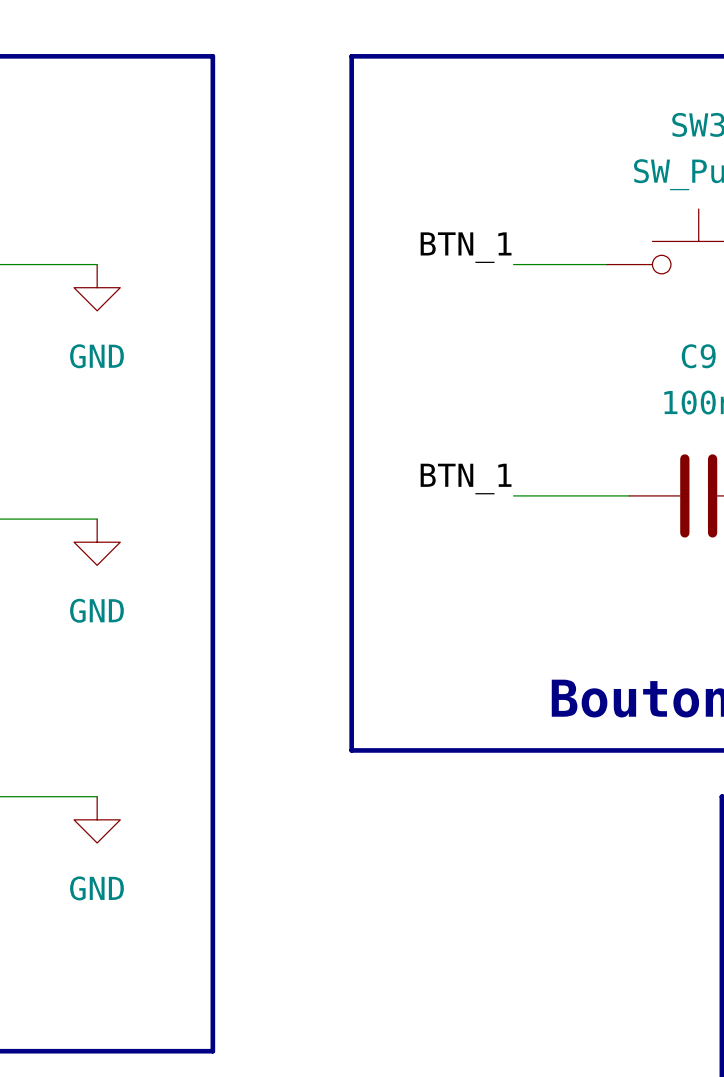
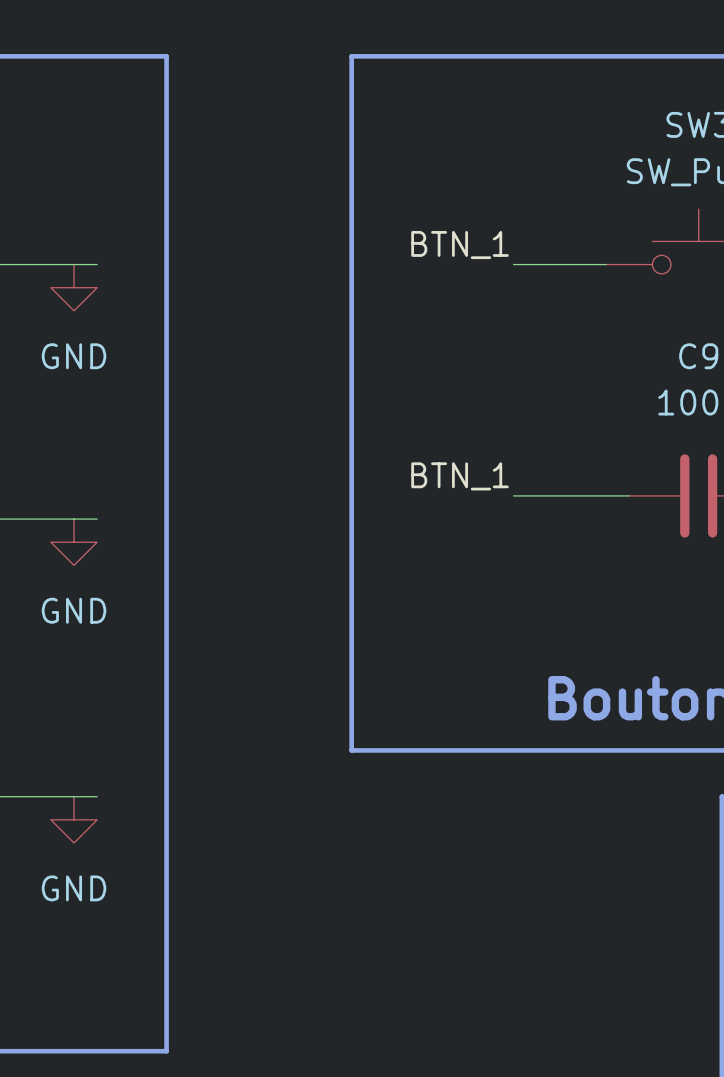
line: (166, 56) (212, 56) (212, 1051) (166, 1051) -> (166, 56) (166, 1051)
power symbol position: GND (97, 287) -> GND (74, 287)
power symbol position: GND (97, 542) -> GND (74, 542)
power symbol position: GND (97, 819) -> GND (74, 819)

